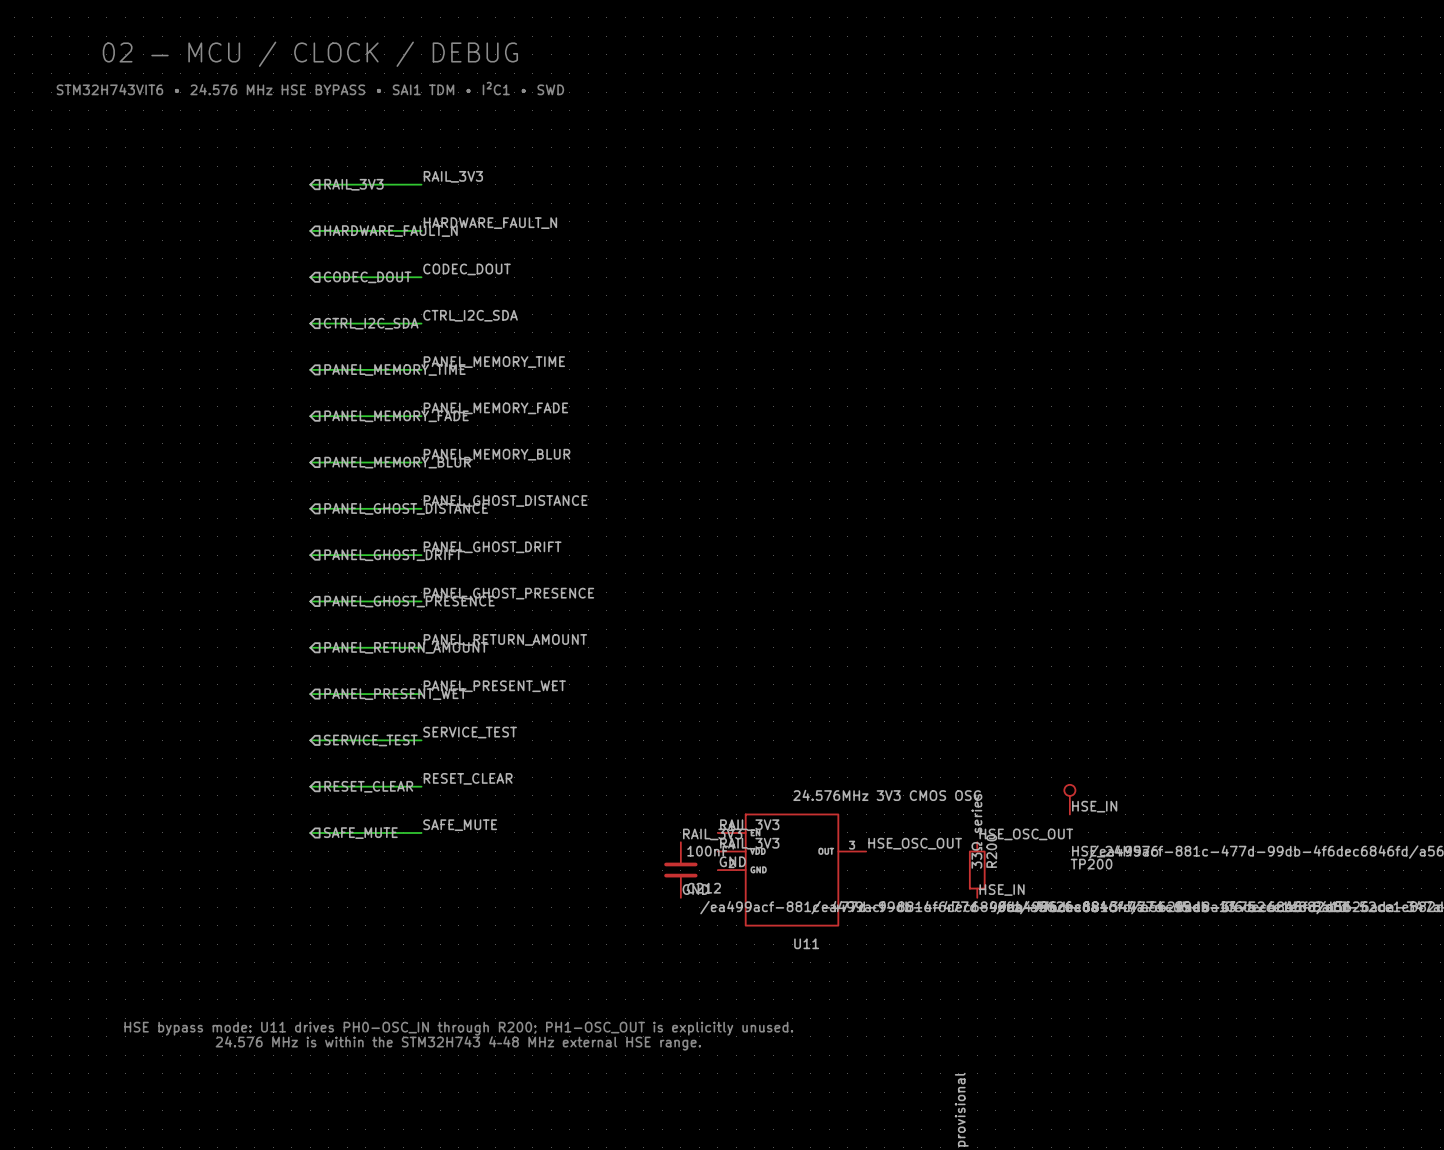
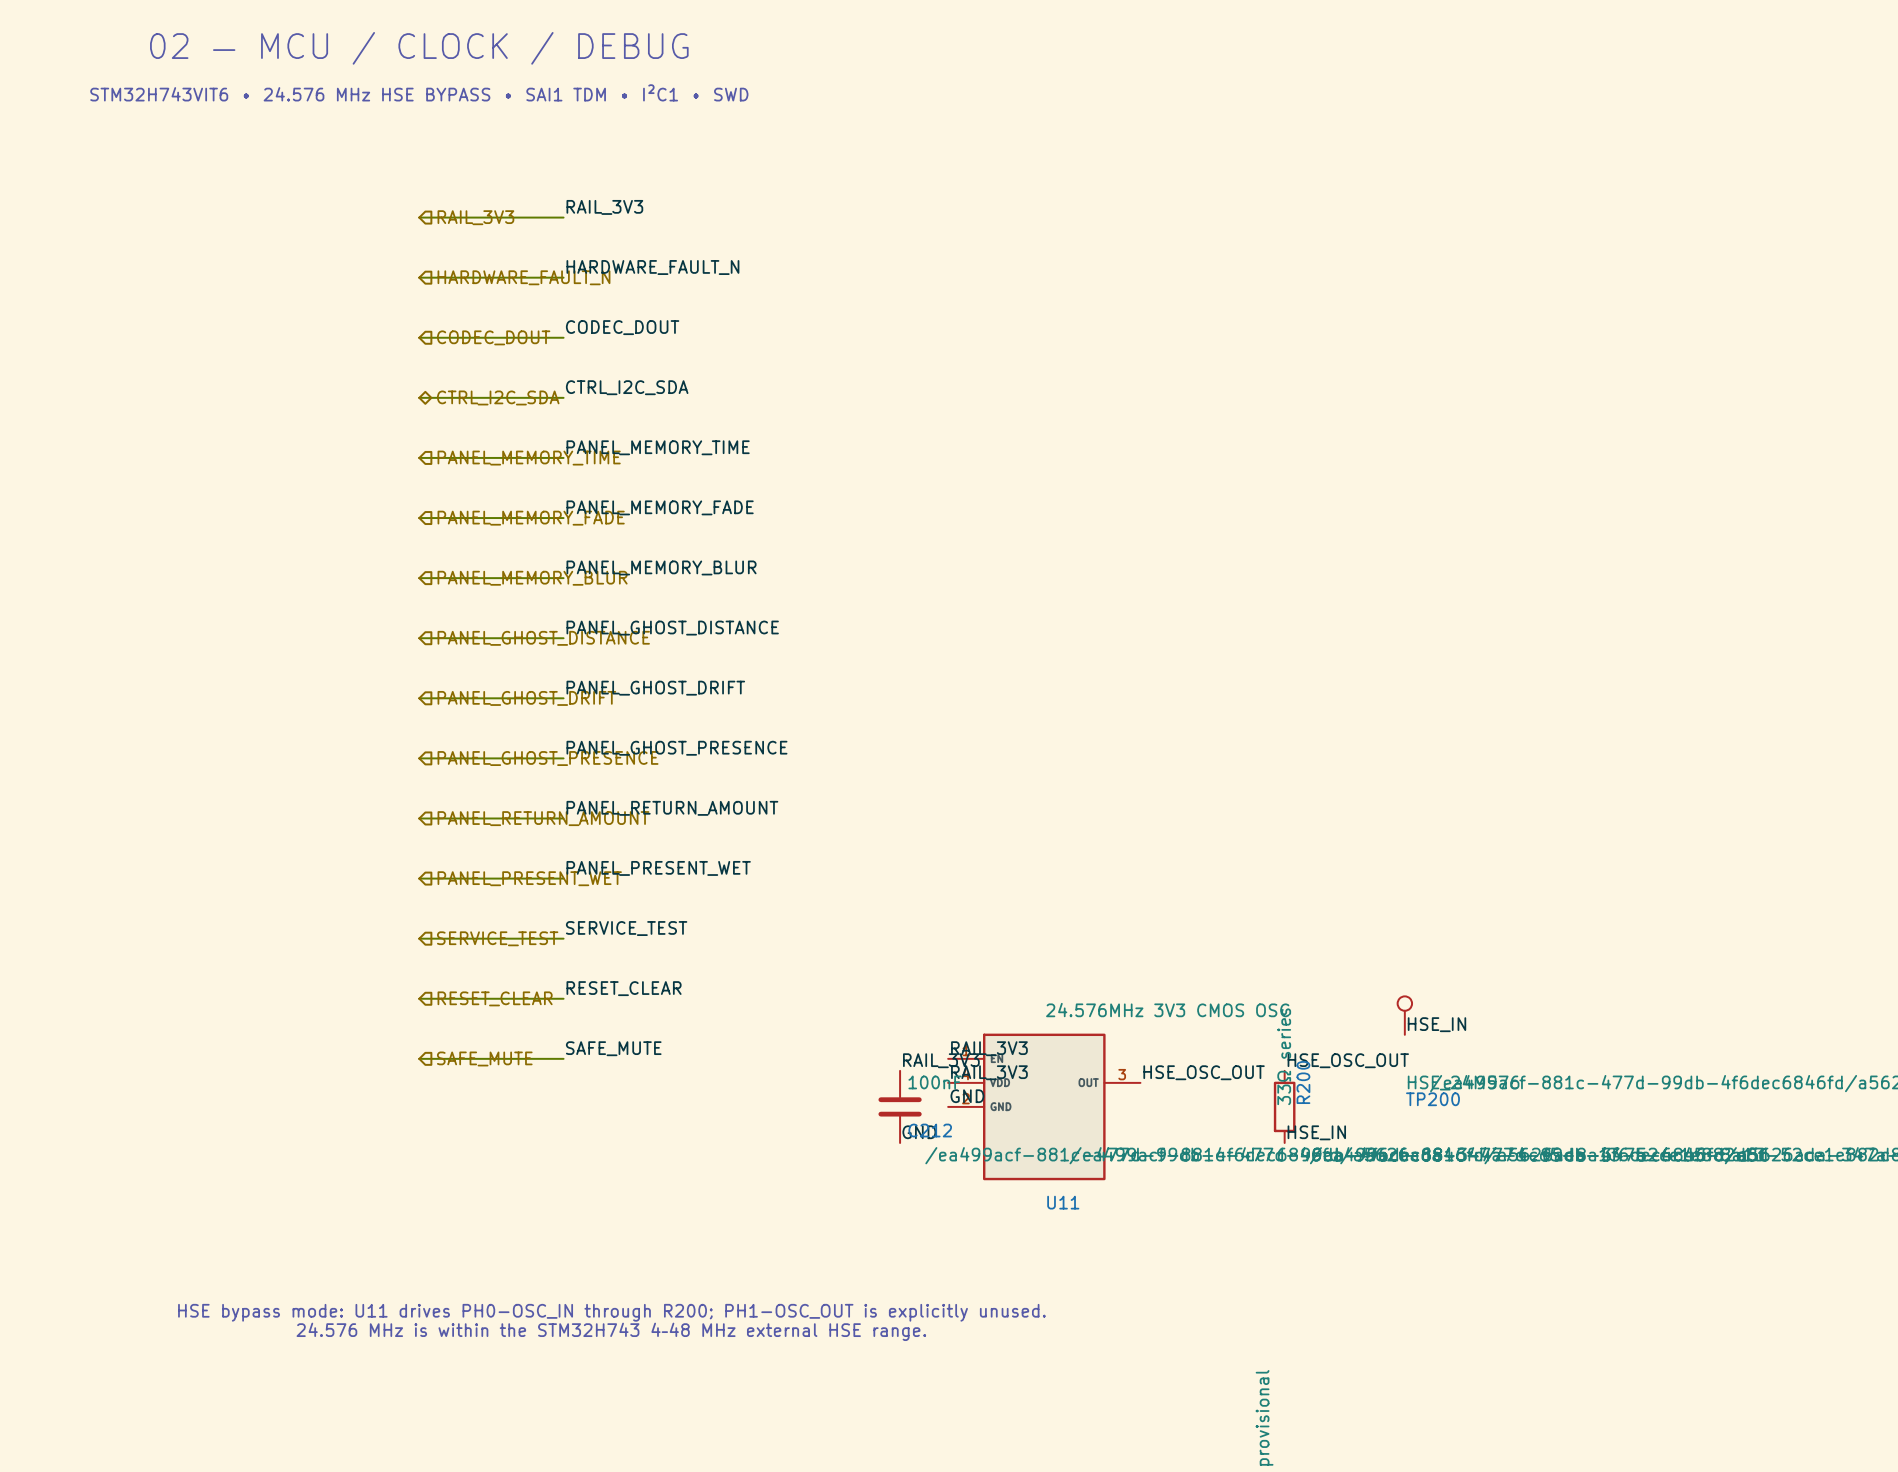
hierarchical label shape: input (371, 323) -> bidirectional (498, 397)

